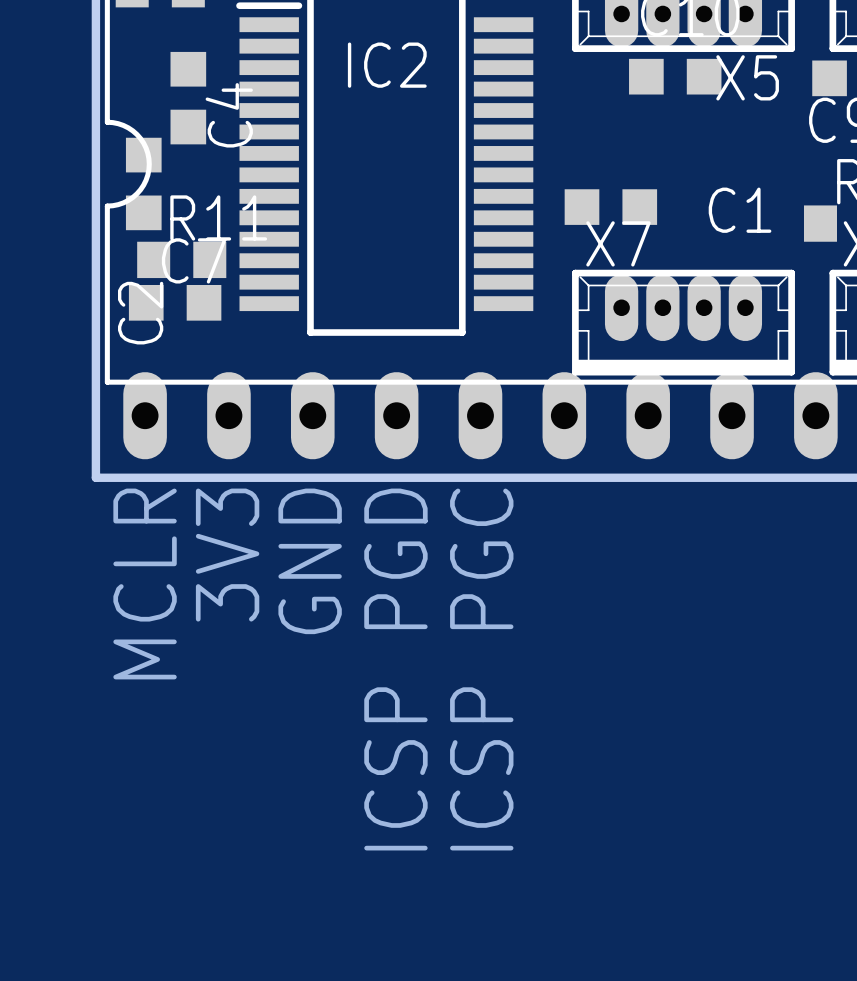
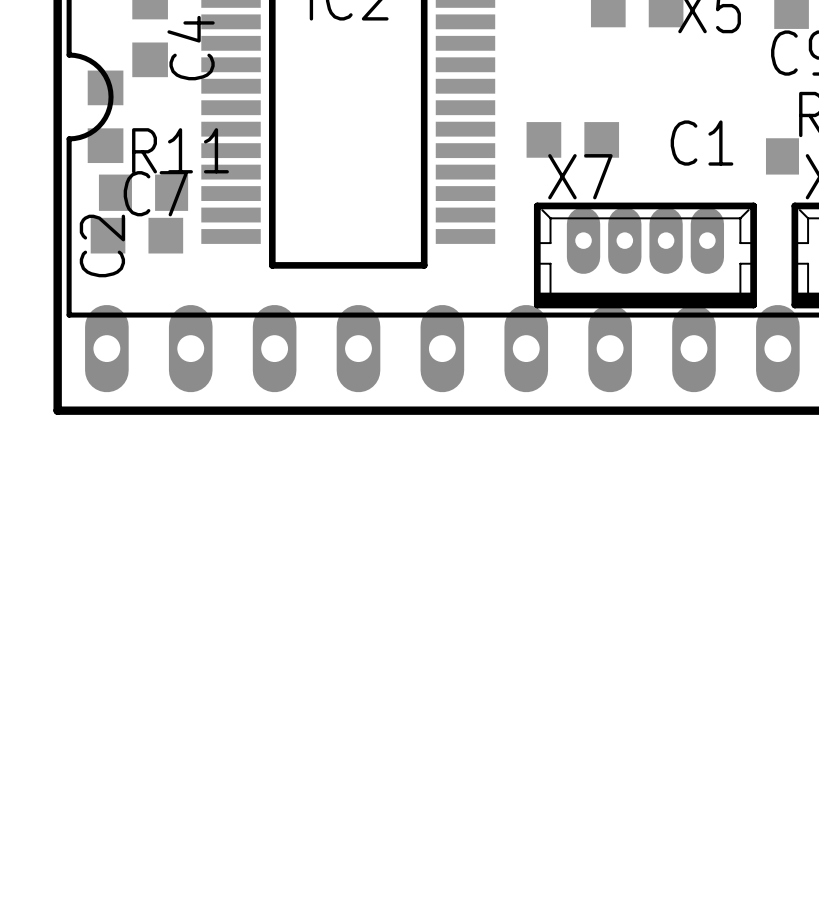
text: 3V3 (227, 555) -> none
text: GND (310, 561) -> none
text: MCLR (145, 583) -> none
text: ICSP PGD (395, 669) -> none
text: ICSP PGC (481, 669) -> none

